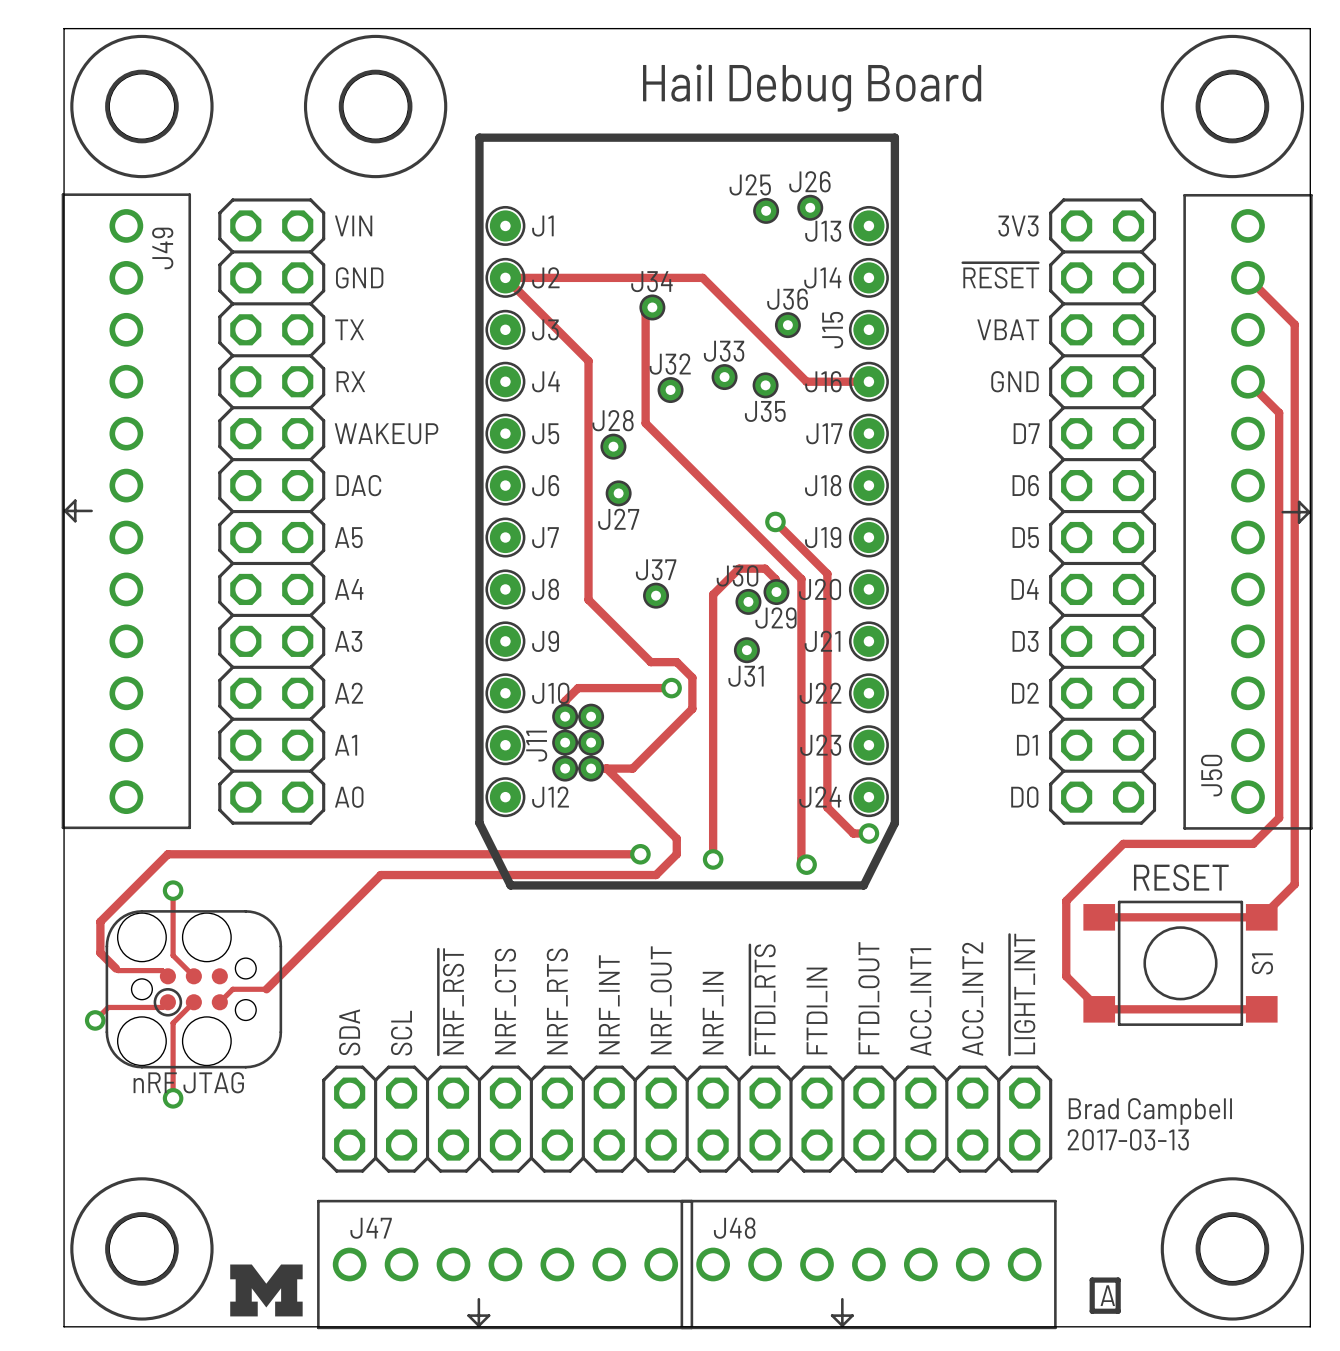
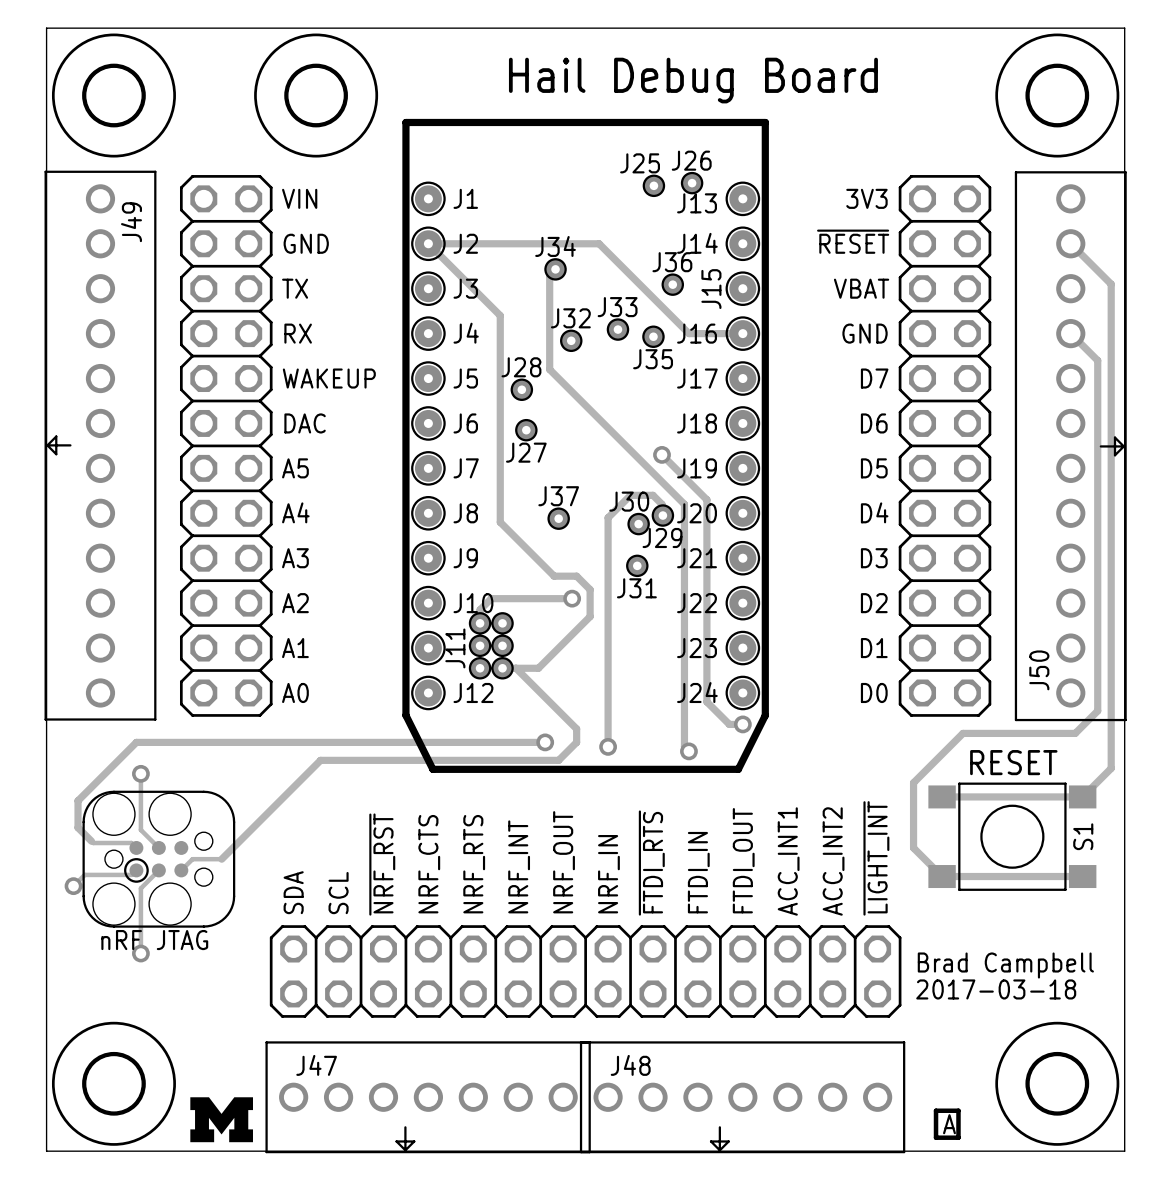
text: 2017-03-13 (1128, 1139) -> 2017-03-18 (996, 989)

